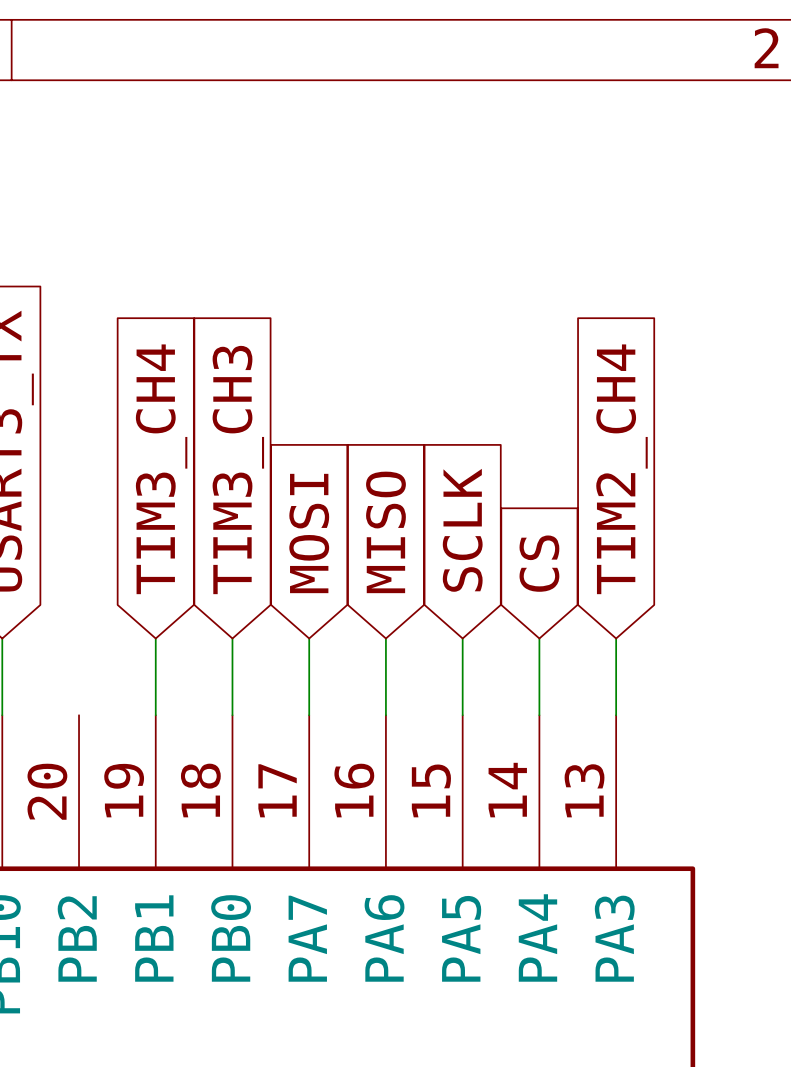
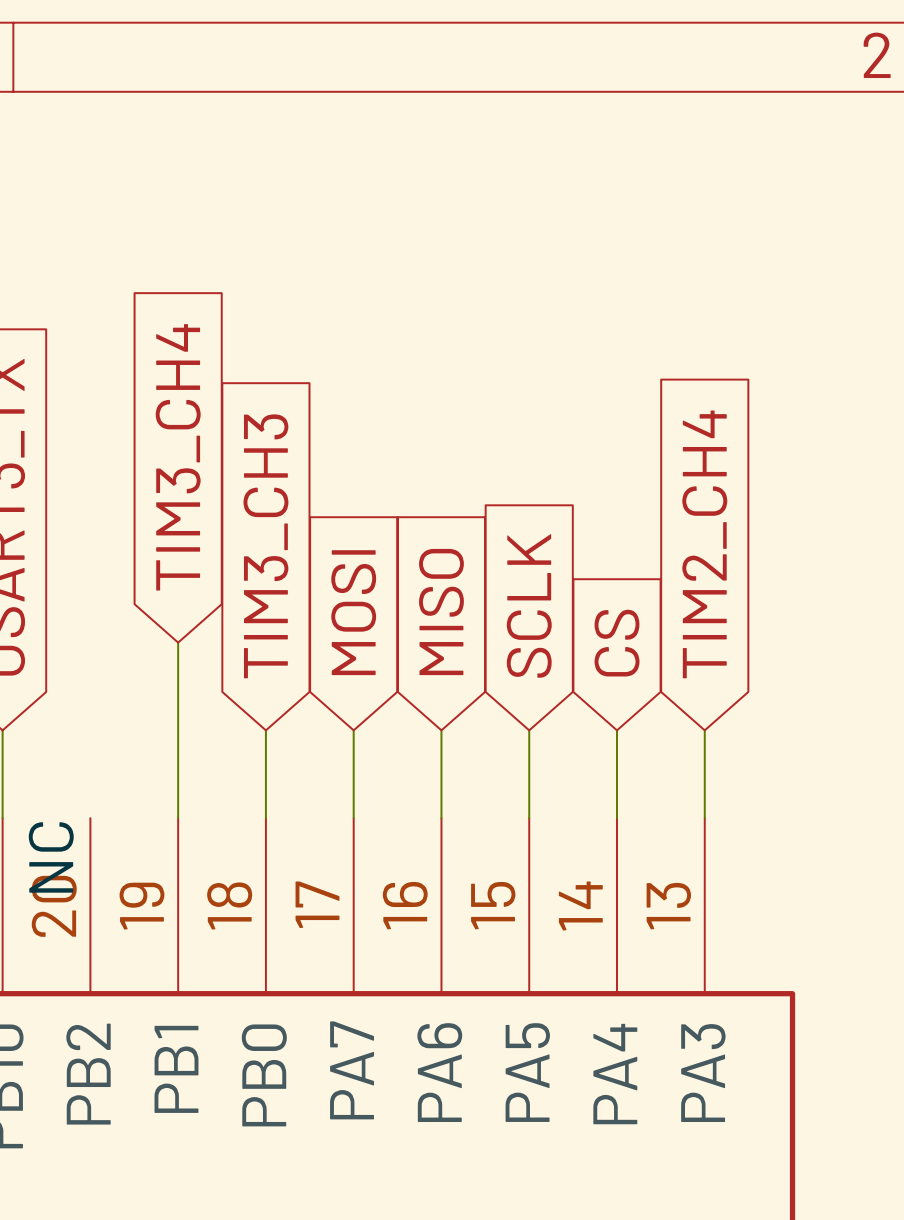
global label position: TIM3_CH4 (161, 469) -> TIM3_CH4 (178, 457)
wire: none -> (178, 642) (178, 730)
label: none -> NC (51, 857)

